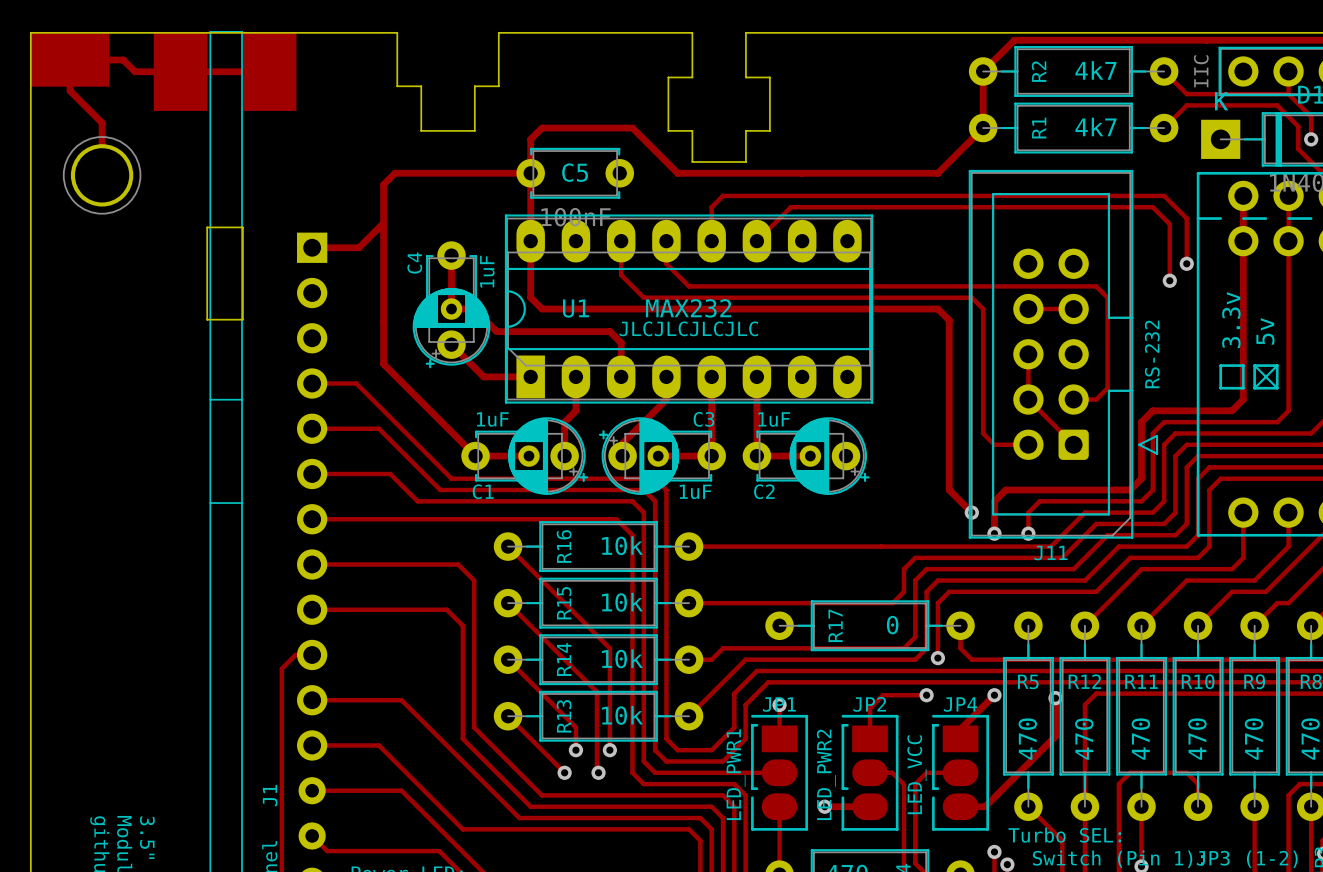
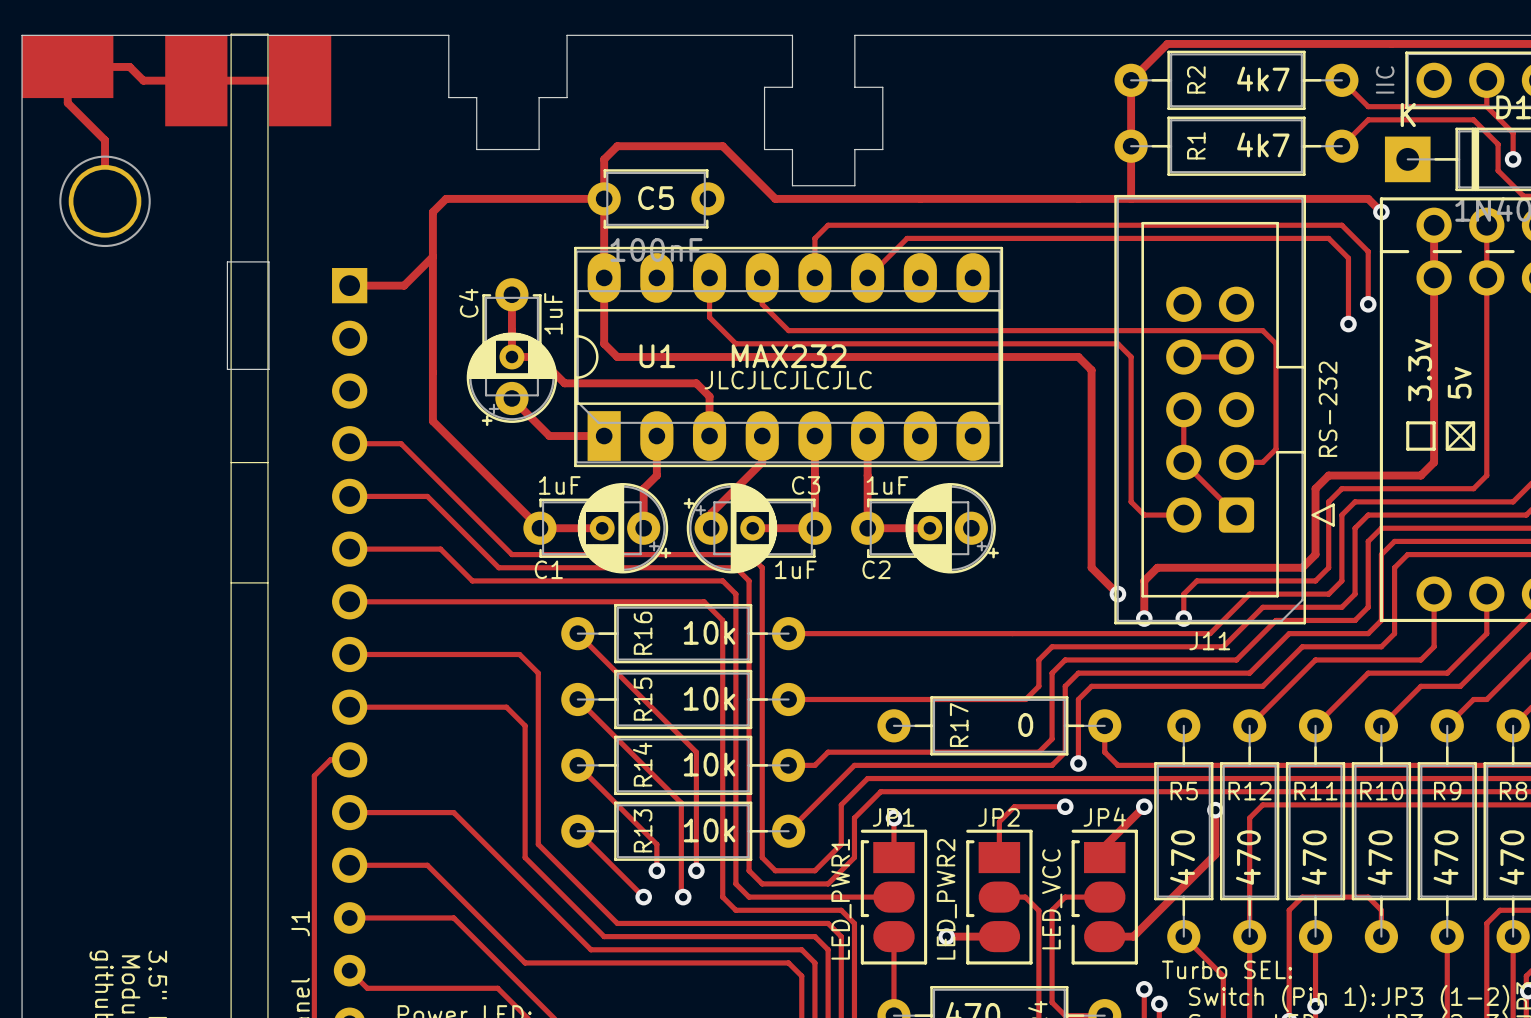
track: (983, 128) (937, 173) -> (1131, 146) (1131, 198)
track: none -> (1078, 198) (1368, 198) (1381, 212)
via: none -> (1381, 212)

